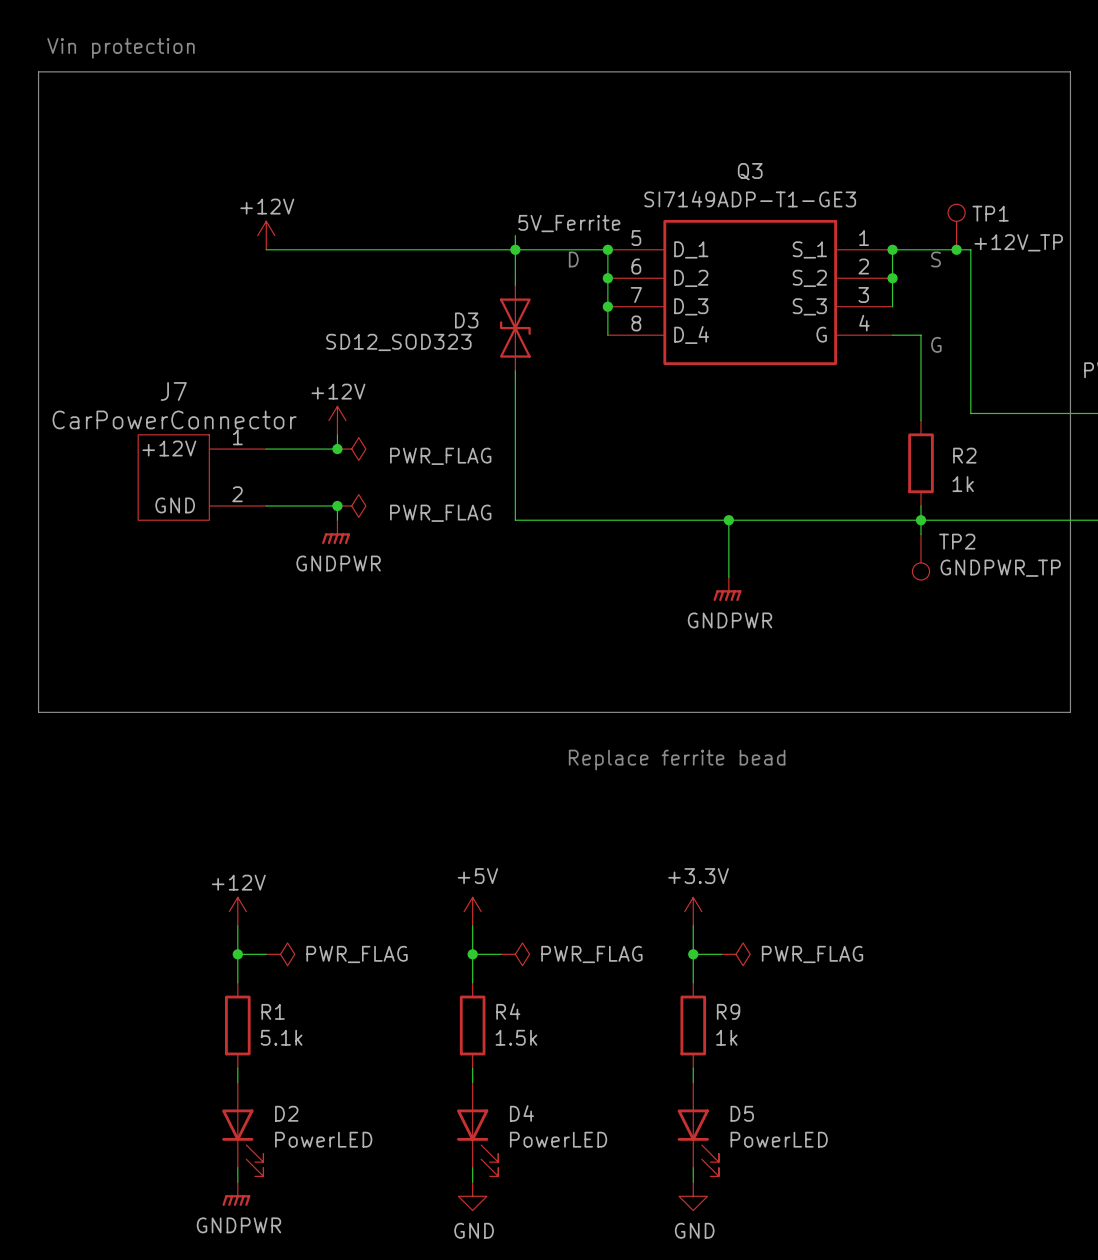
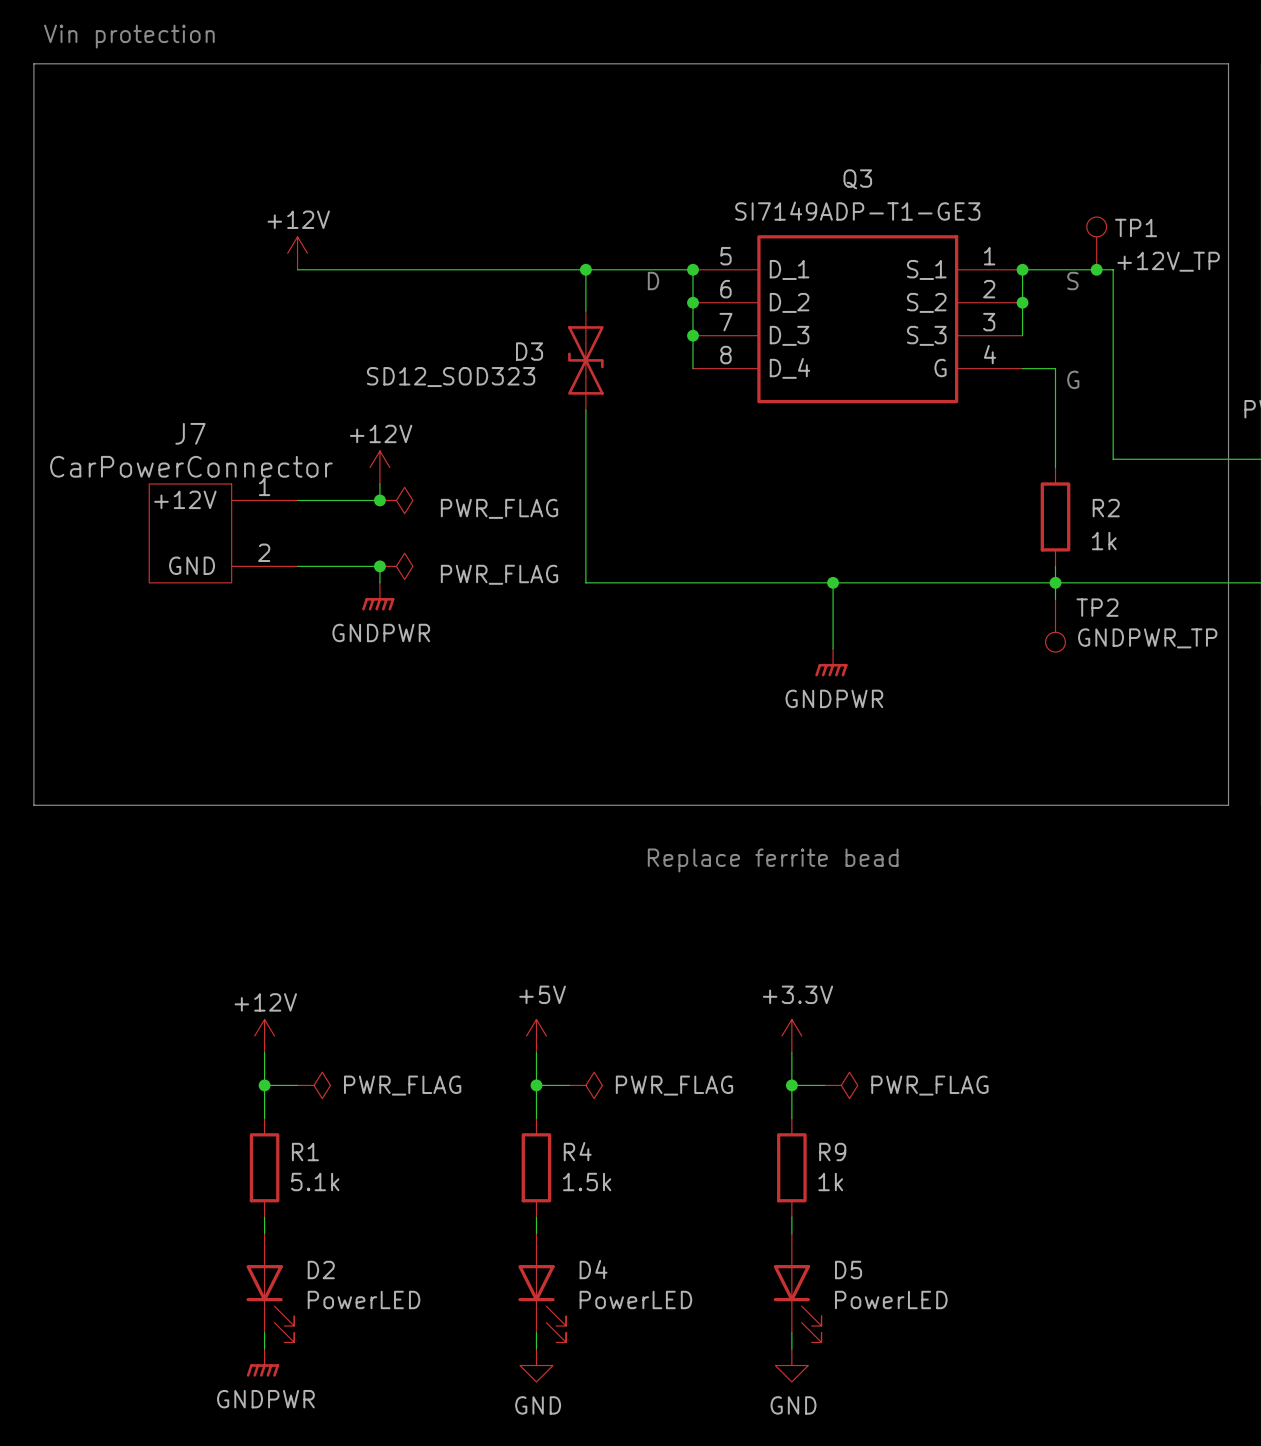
label: 5V_Ferrite (569, 223) -> none
wire: (515, 235) (515, 249) -> none

